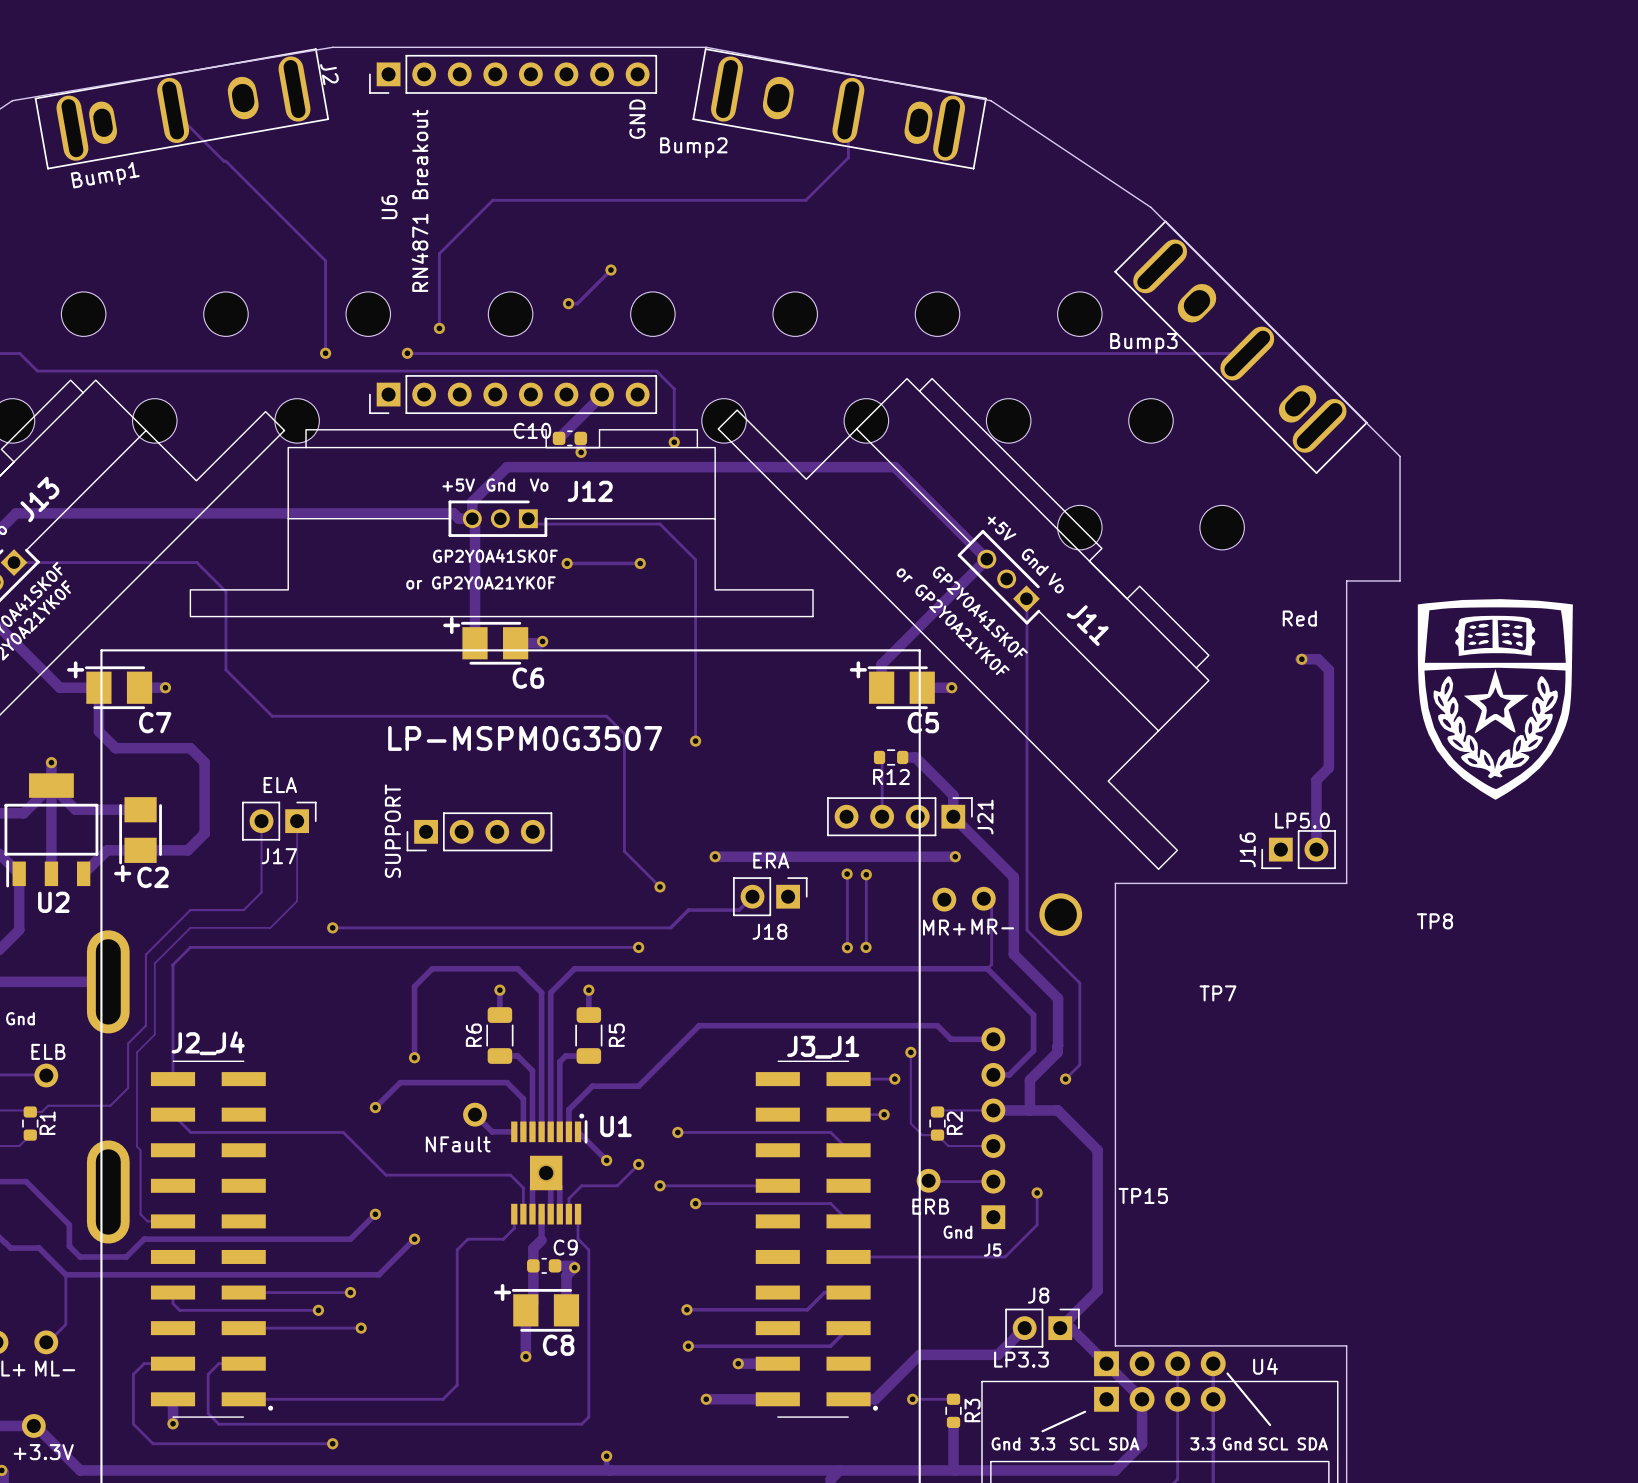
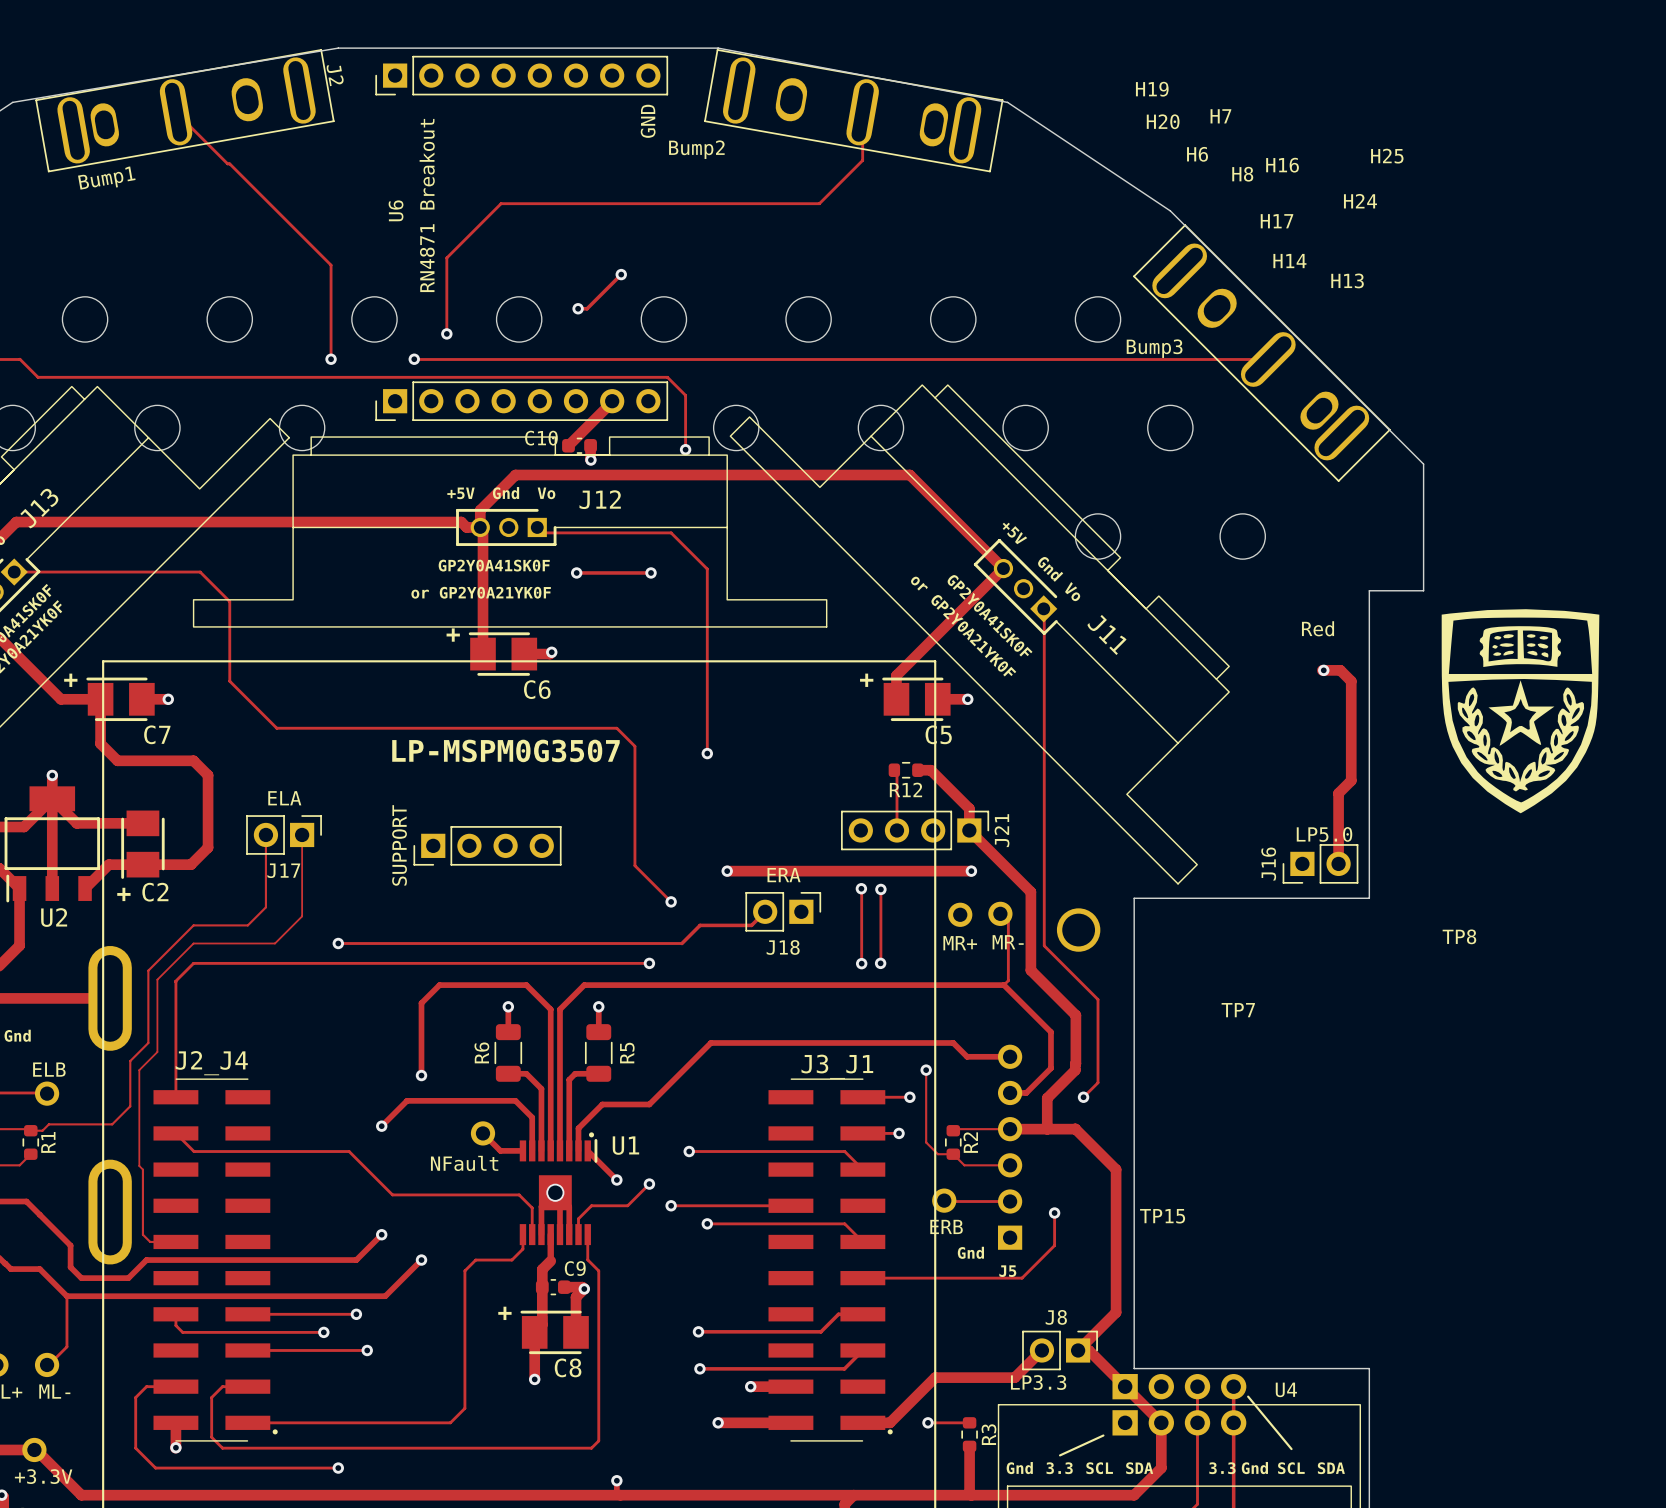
H19 name: none -> H19 (1152, 89)
H7 name: none -> H7 (1220, 116)
H20 name: none -> H20 (1163, 121)
H6 name: none -> H6 (1197, 154)
H25 name: none -> H25 (1387, 156)
H16 name: none -> H16 (1282, 165)
H8 name: none -> H8 (1242, 174)
H24 name: none -> H24 (1360, 201)
H17 name: none -> H17 (1277, 221)
H14 name: none -> H14 (1289, 261)
H13 name: none -> H13 (1347, 280)

